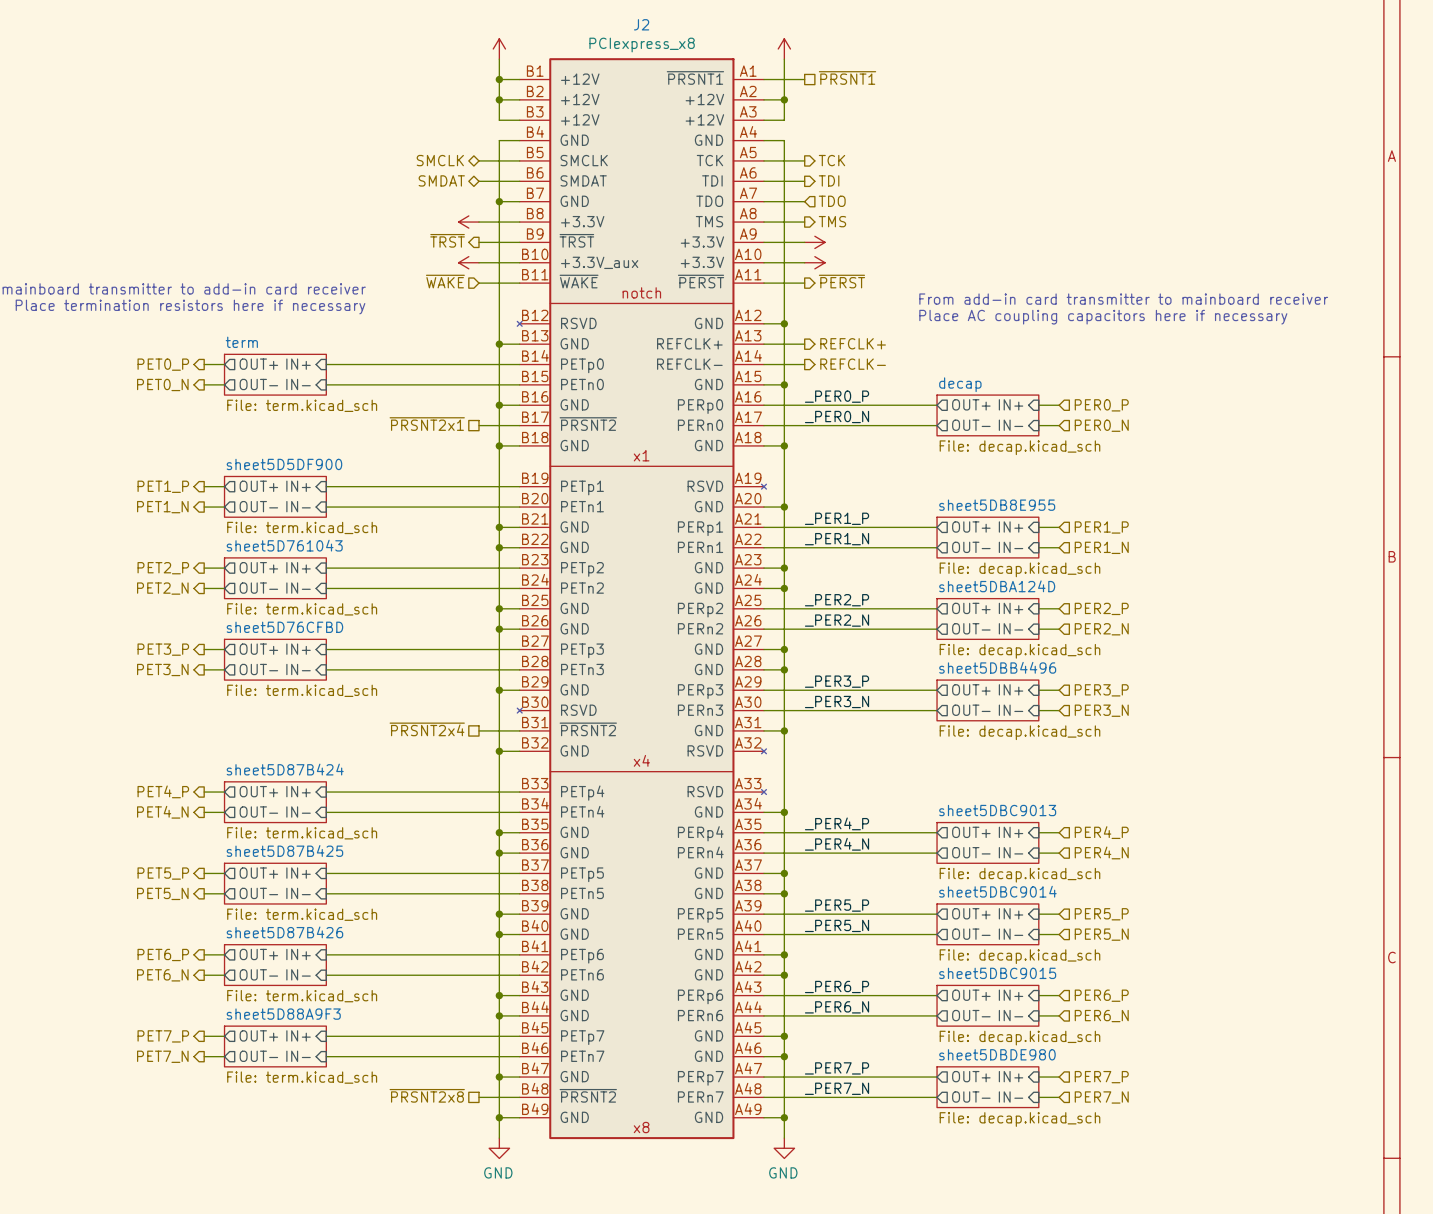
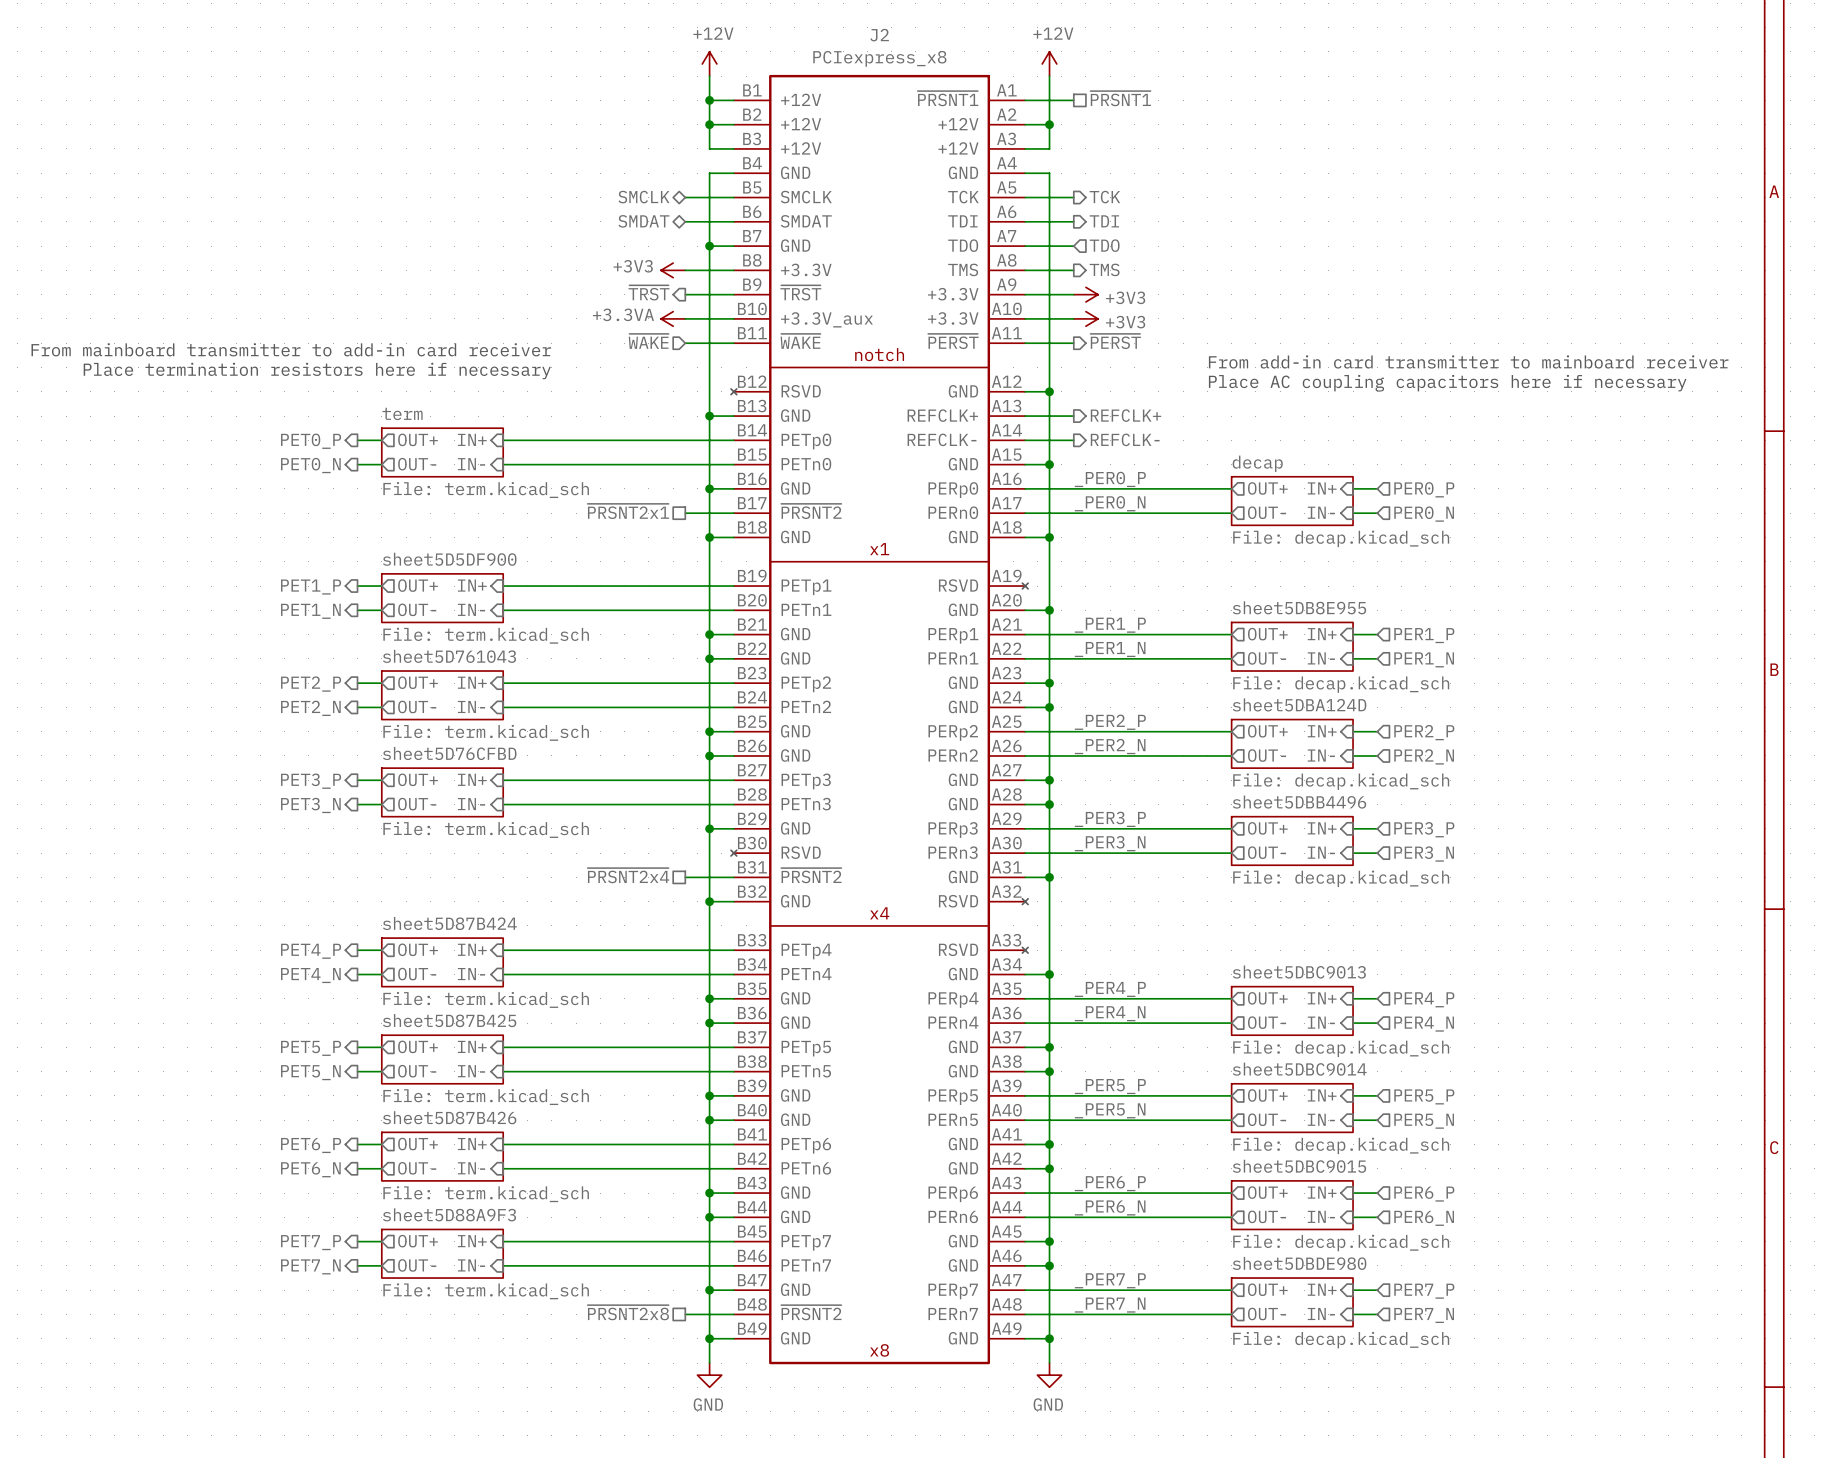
power symbol text: none -> +12V (713, 33)
power symbol text: none -> +12V (1053, 33)
power symbol text: none -> +3V3 (633, 266)
power symbol text: none -> +3V3 (1125, 297)
power symbol text: none -> +3.3VA (623, 314)
power symbol text: none -> +3V3 (1125, 322)

